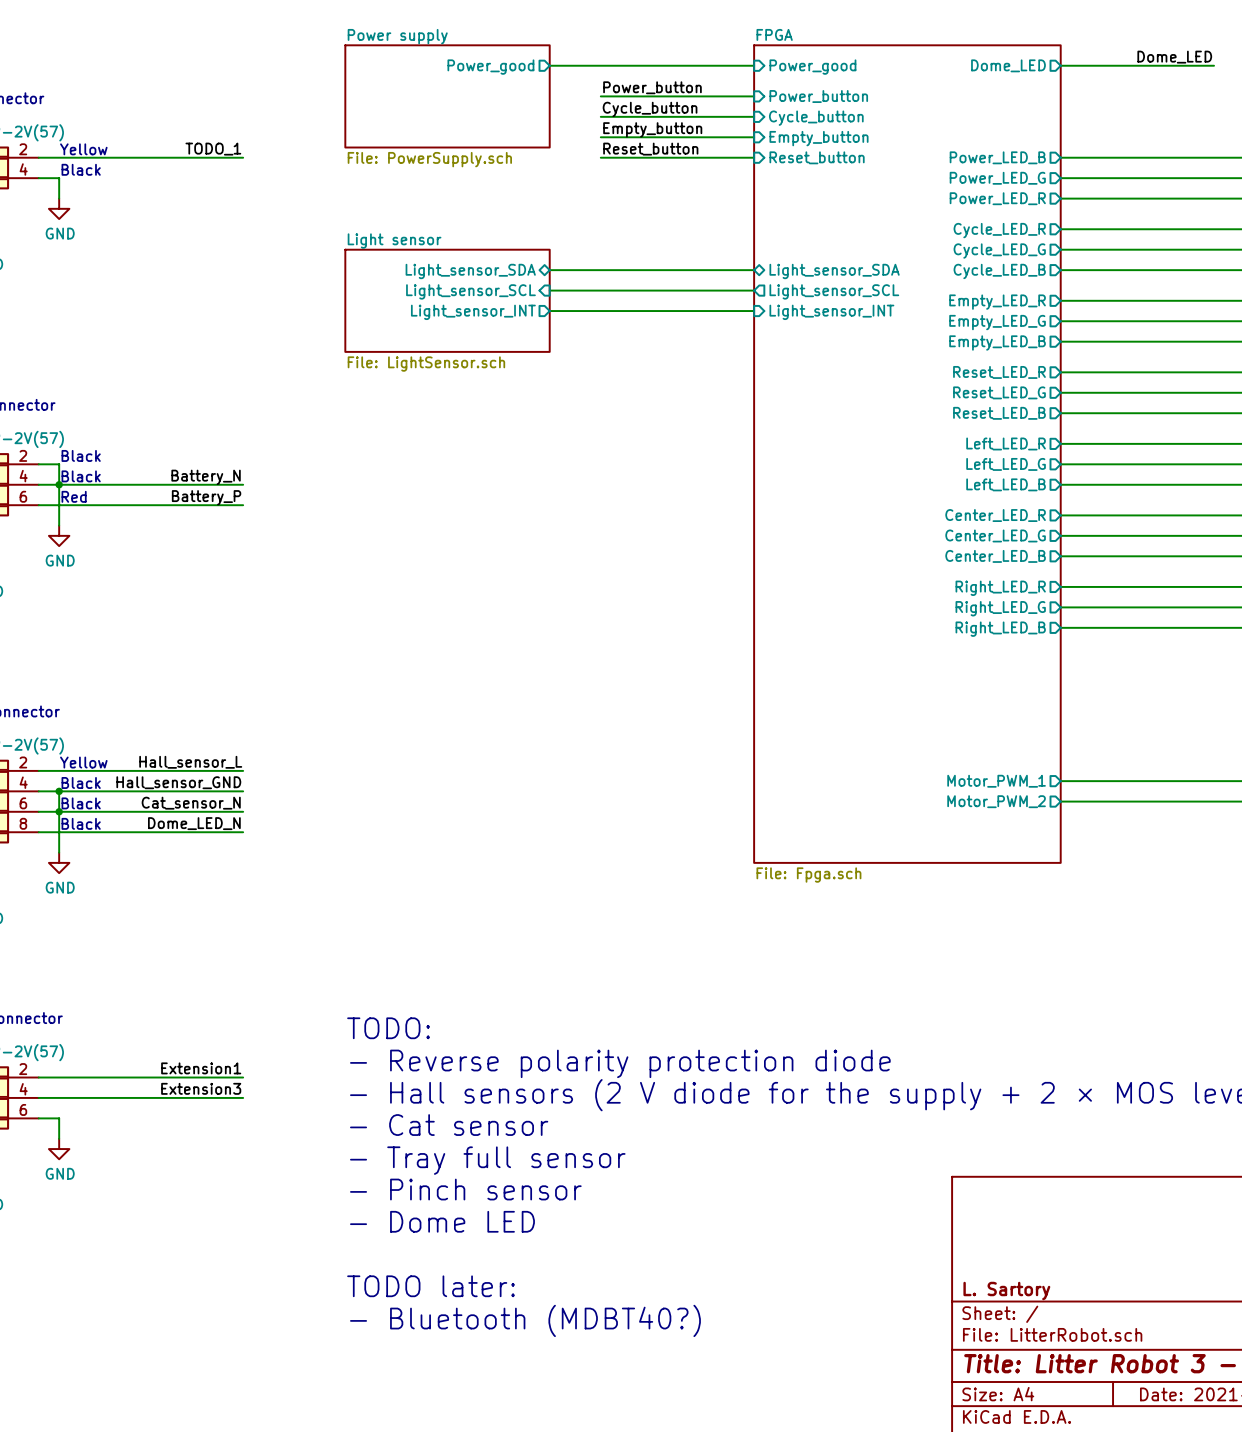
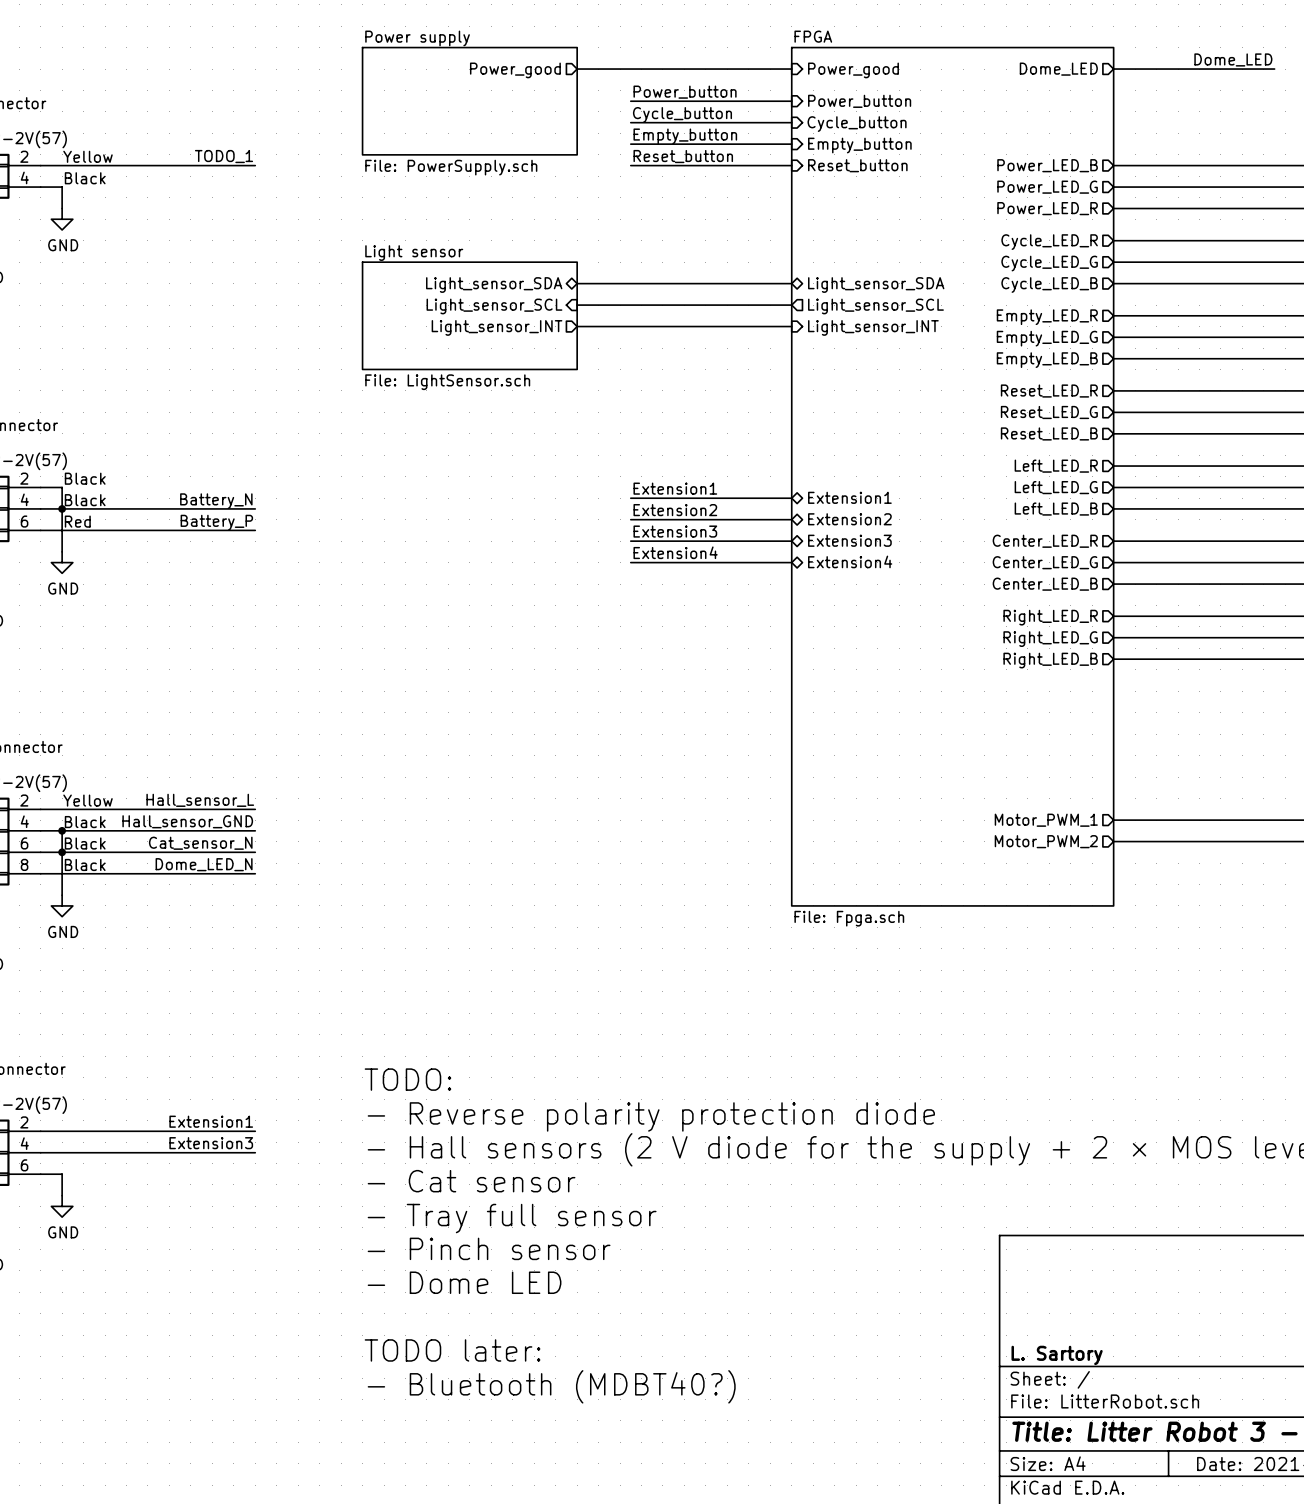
label: none -> Extension1 (675, 488)
wire: none -> (630, 498) (791, 498)
sheet pin: none -> Extension1 (849, 497)
label: none -> Extension2 (675, 510)
wire: none -> (630, 519) (791, 519)
sheet pin: none -> Extension2 (849, 519)
label: none -> Extension3 (675, 531)
wire: none -> (630, 541) (791, 541)
sheet pin: none -> Extension3 (849, 540)
label: none -> Extension4 (675, 552)
wire: none -> (630, 562) (791, 562)
sheet pin: none -> Extension4 (850, 561)

